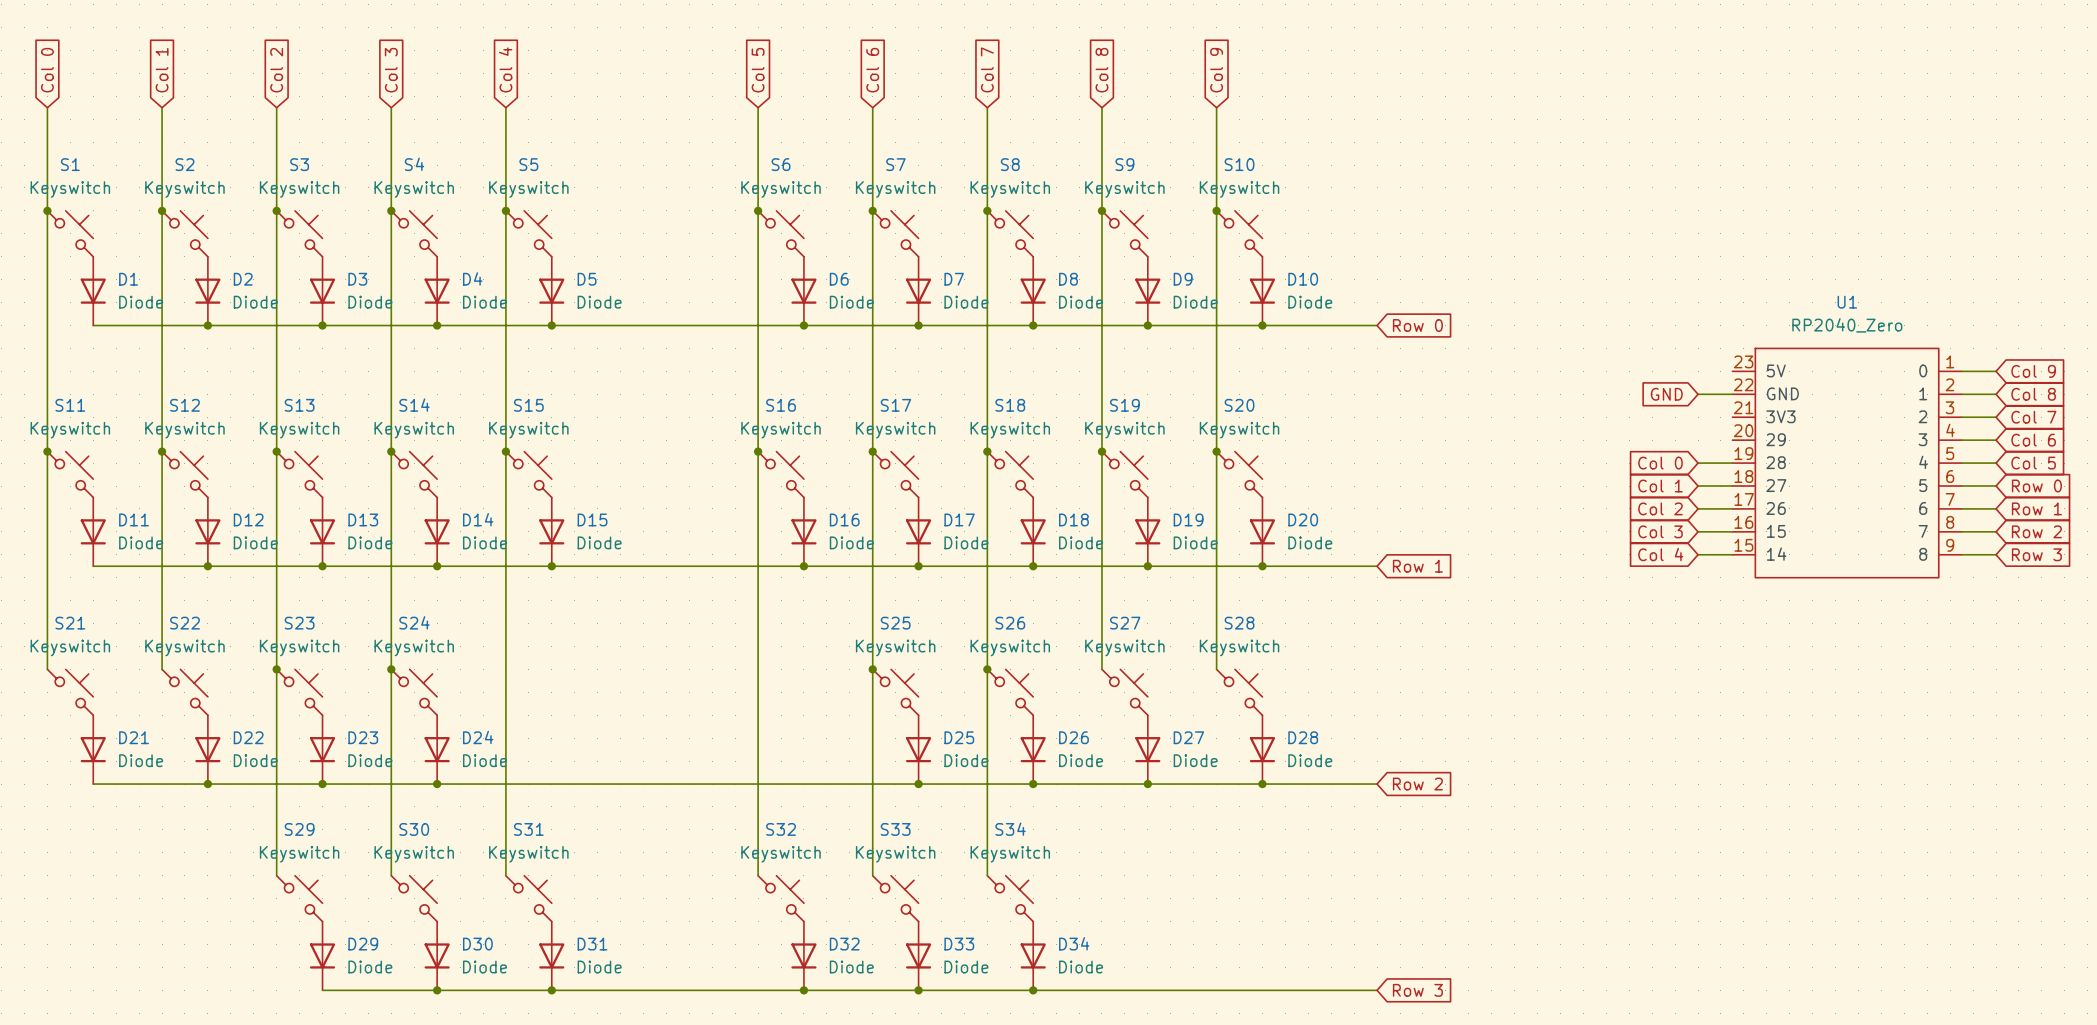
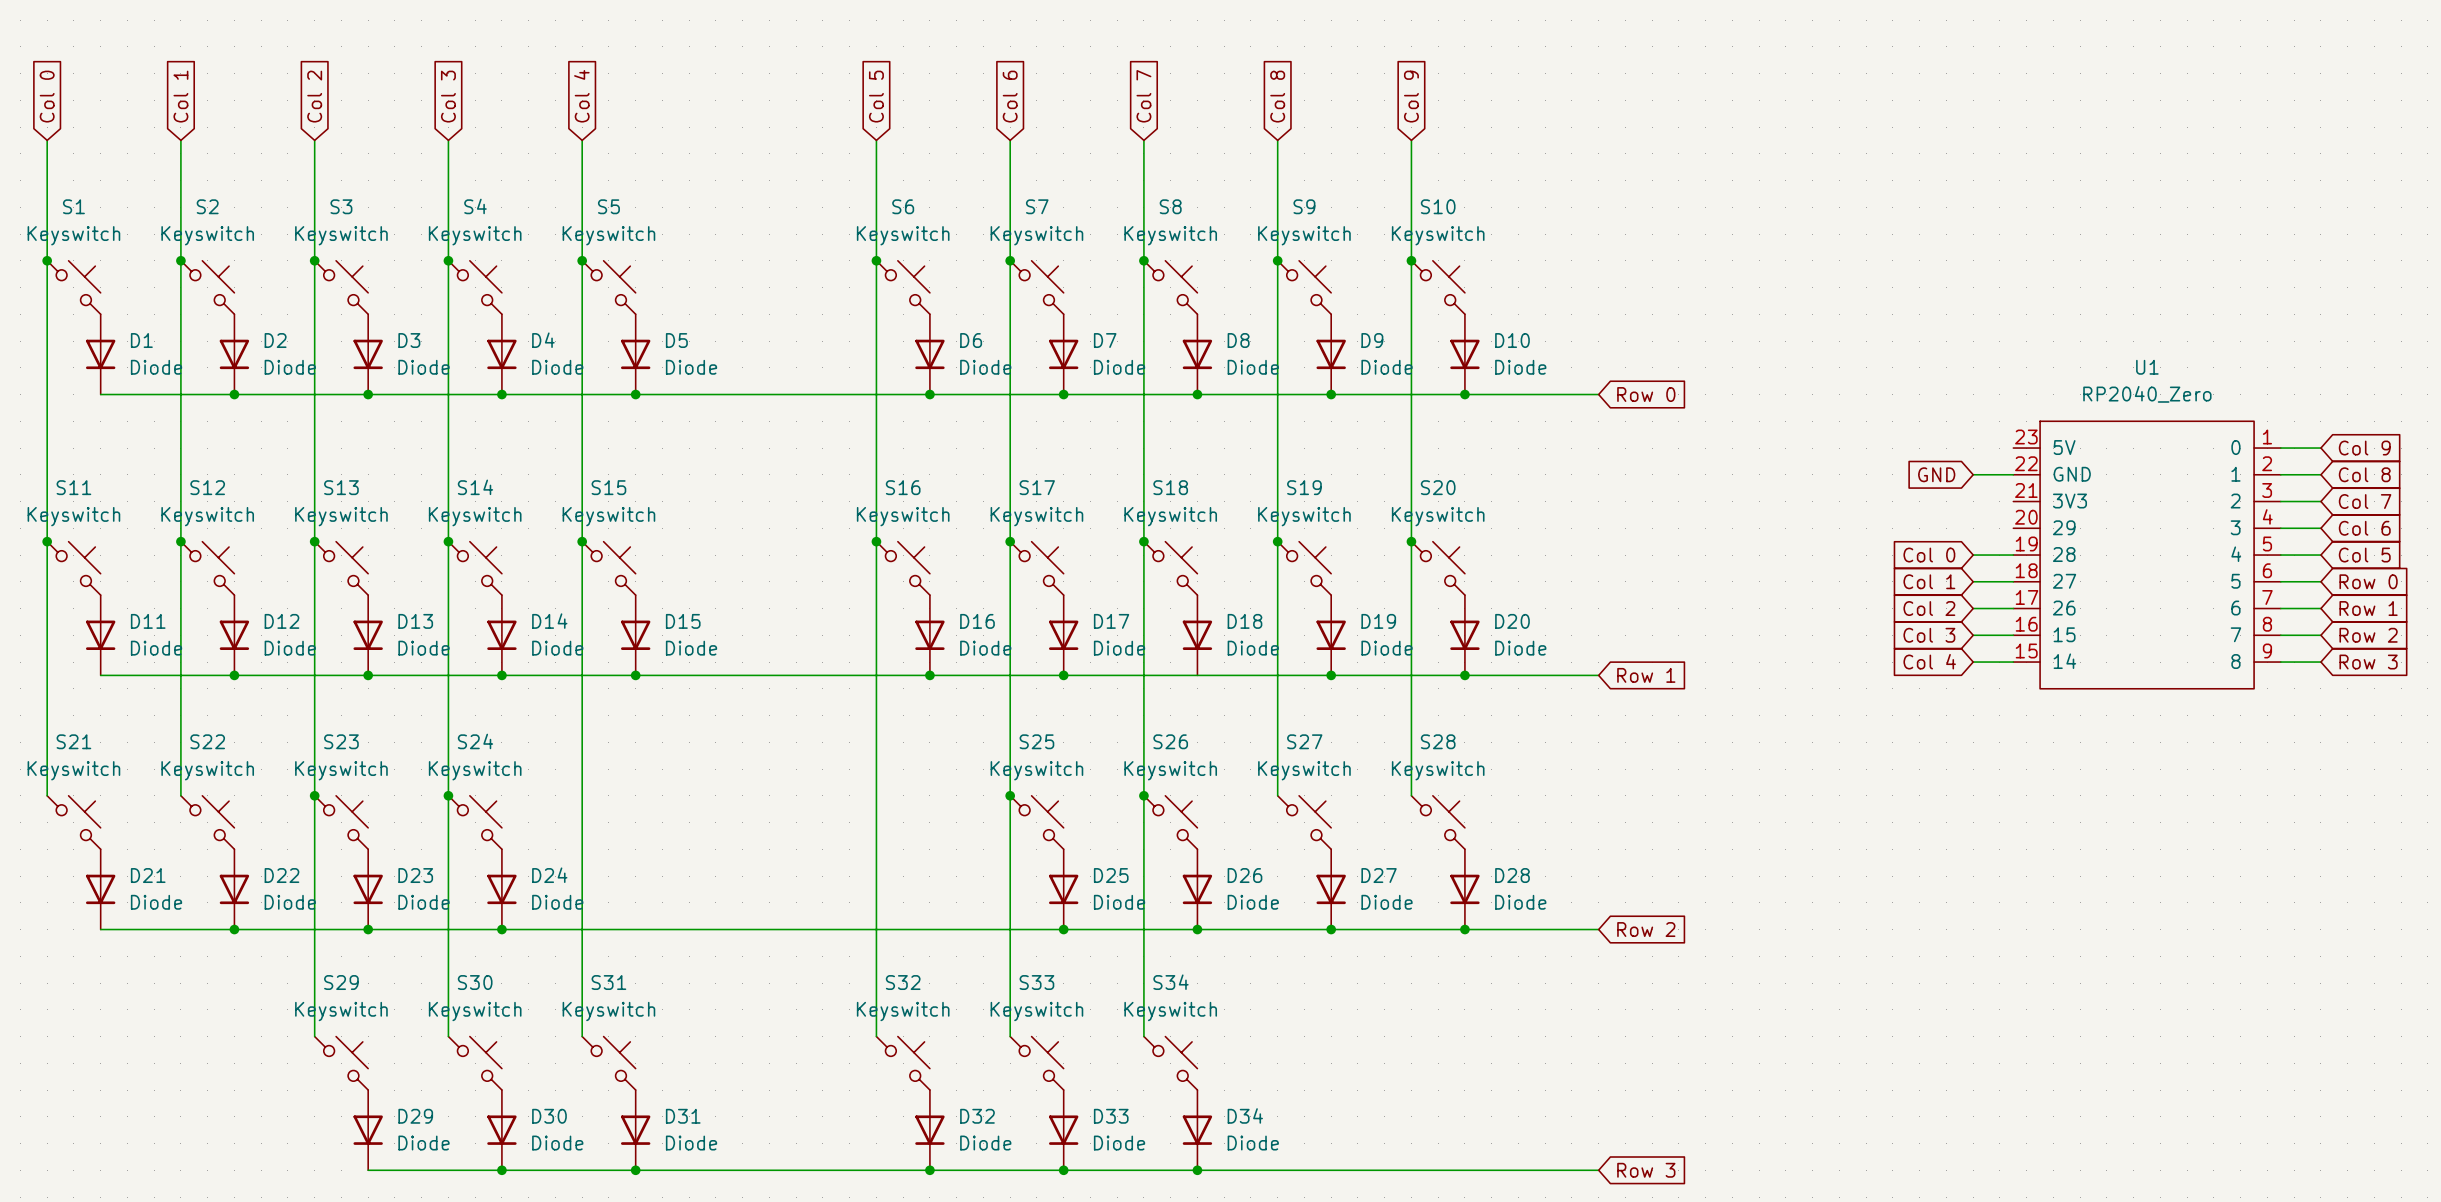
junction: (1033, 566) -> none

